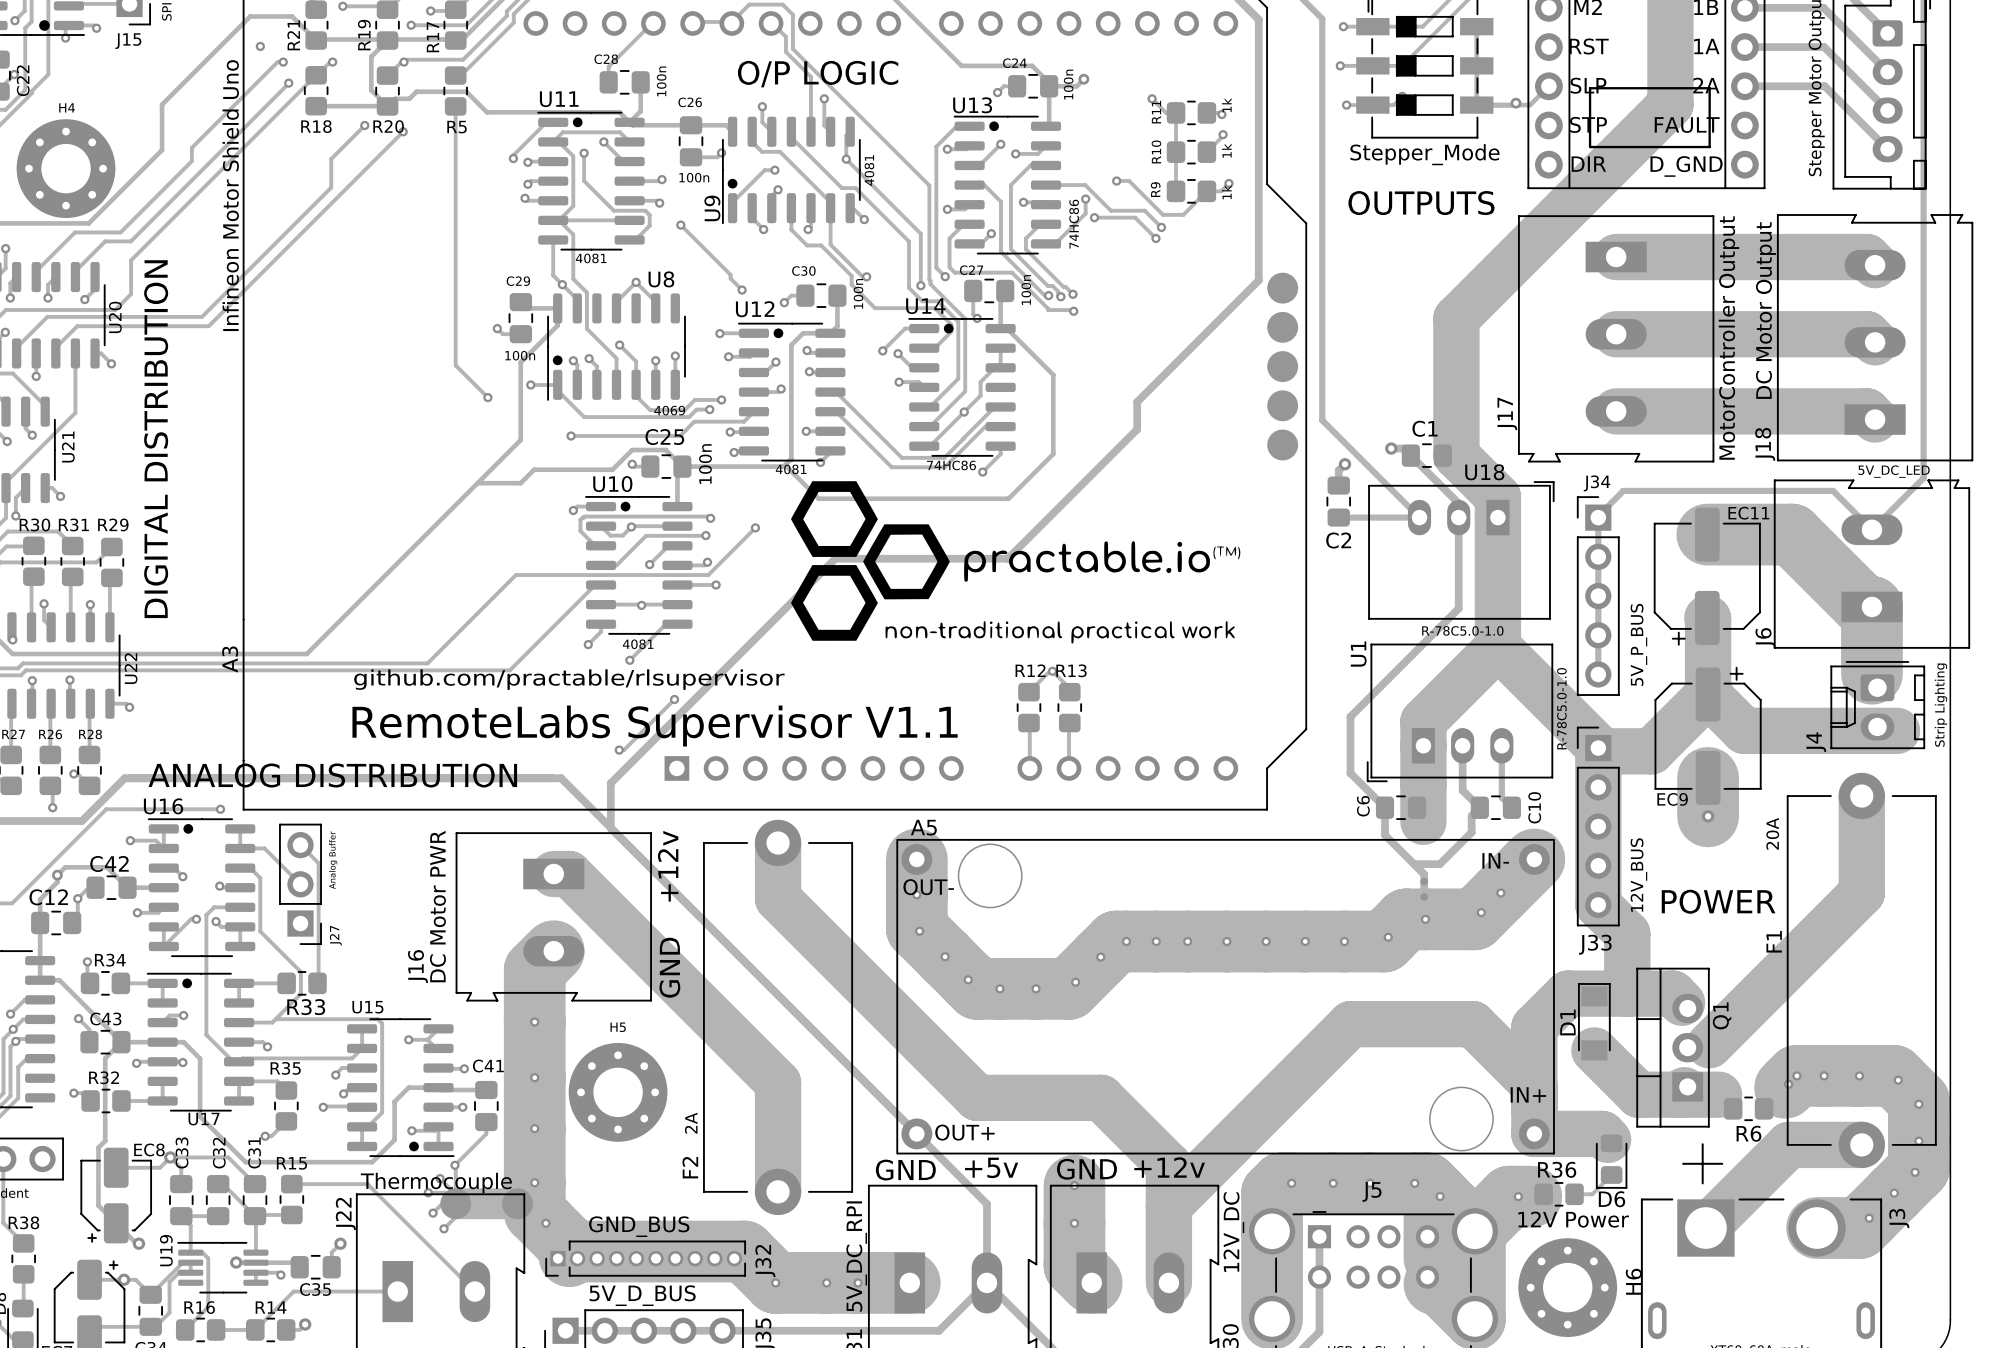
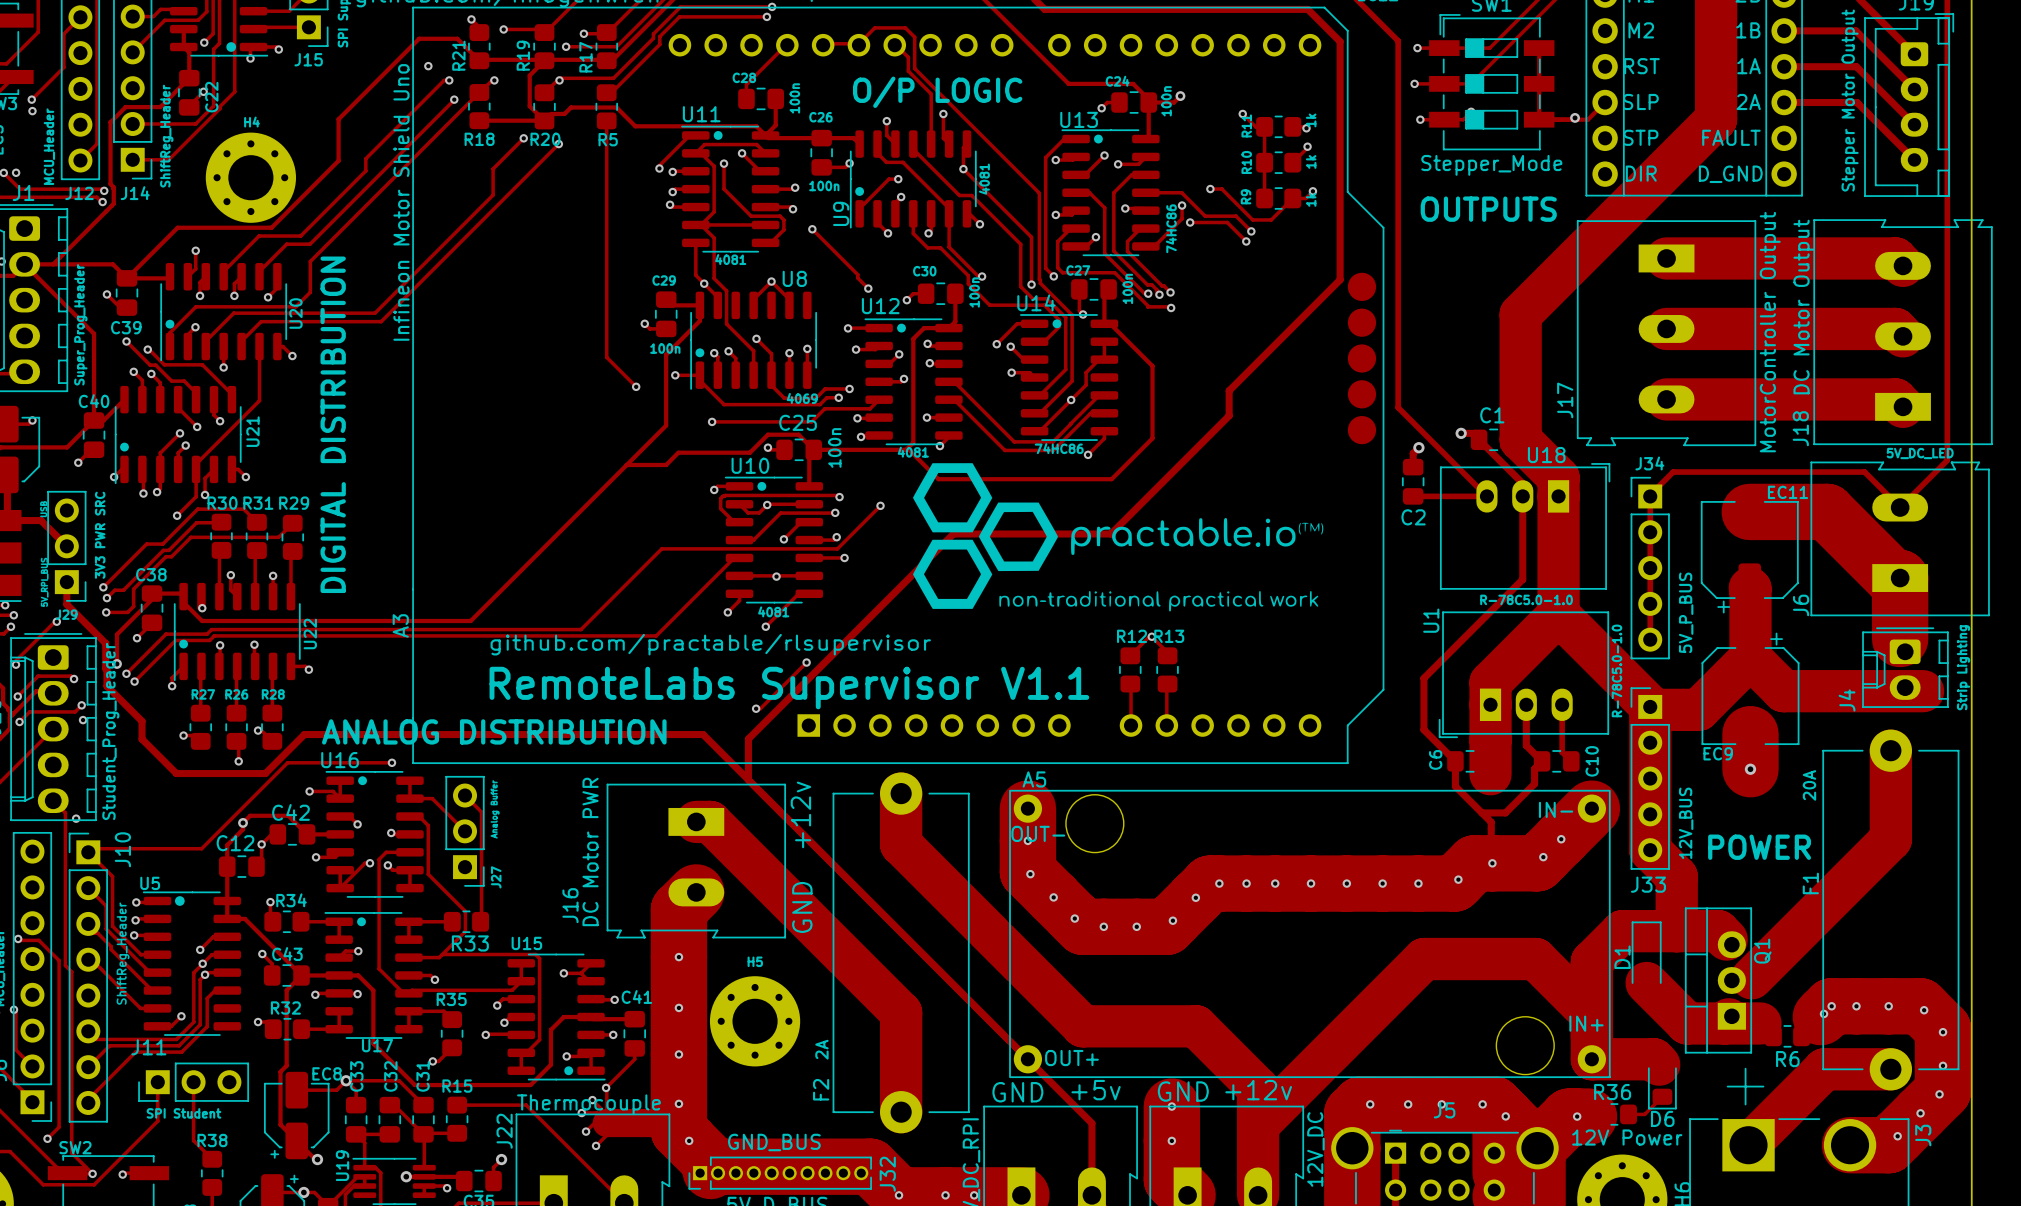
line: (1590, 88) (1709, 88) (1709, 147) (1590, 147) (1590, 88) -> none

